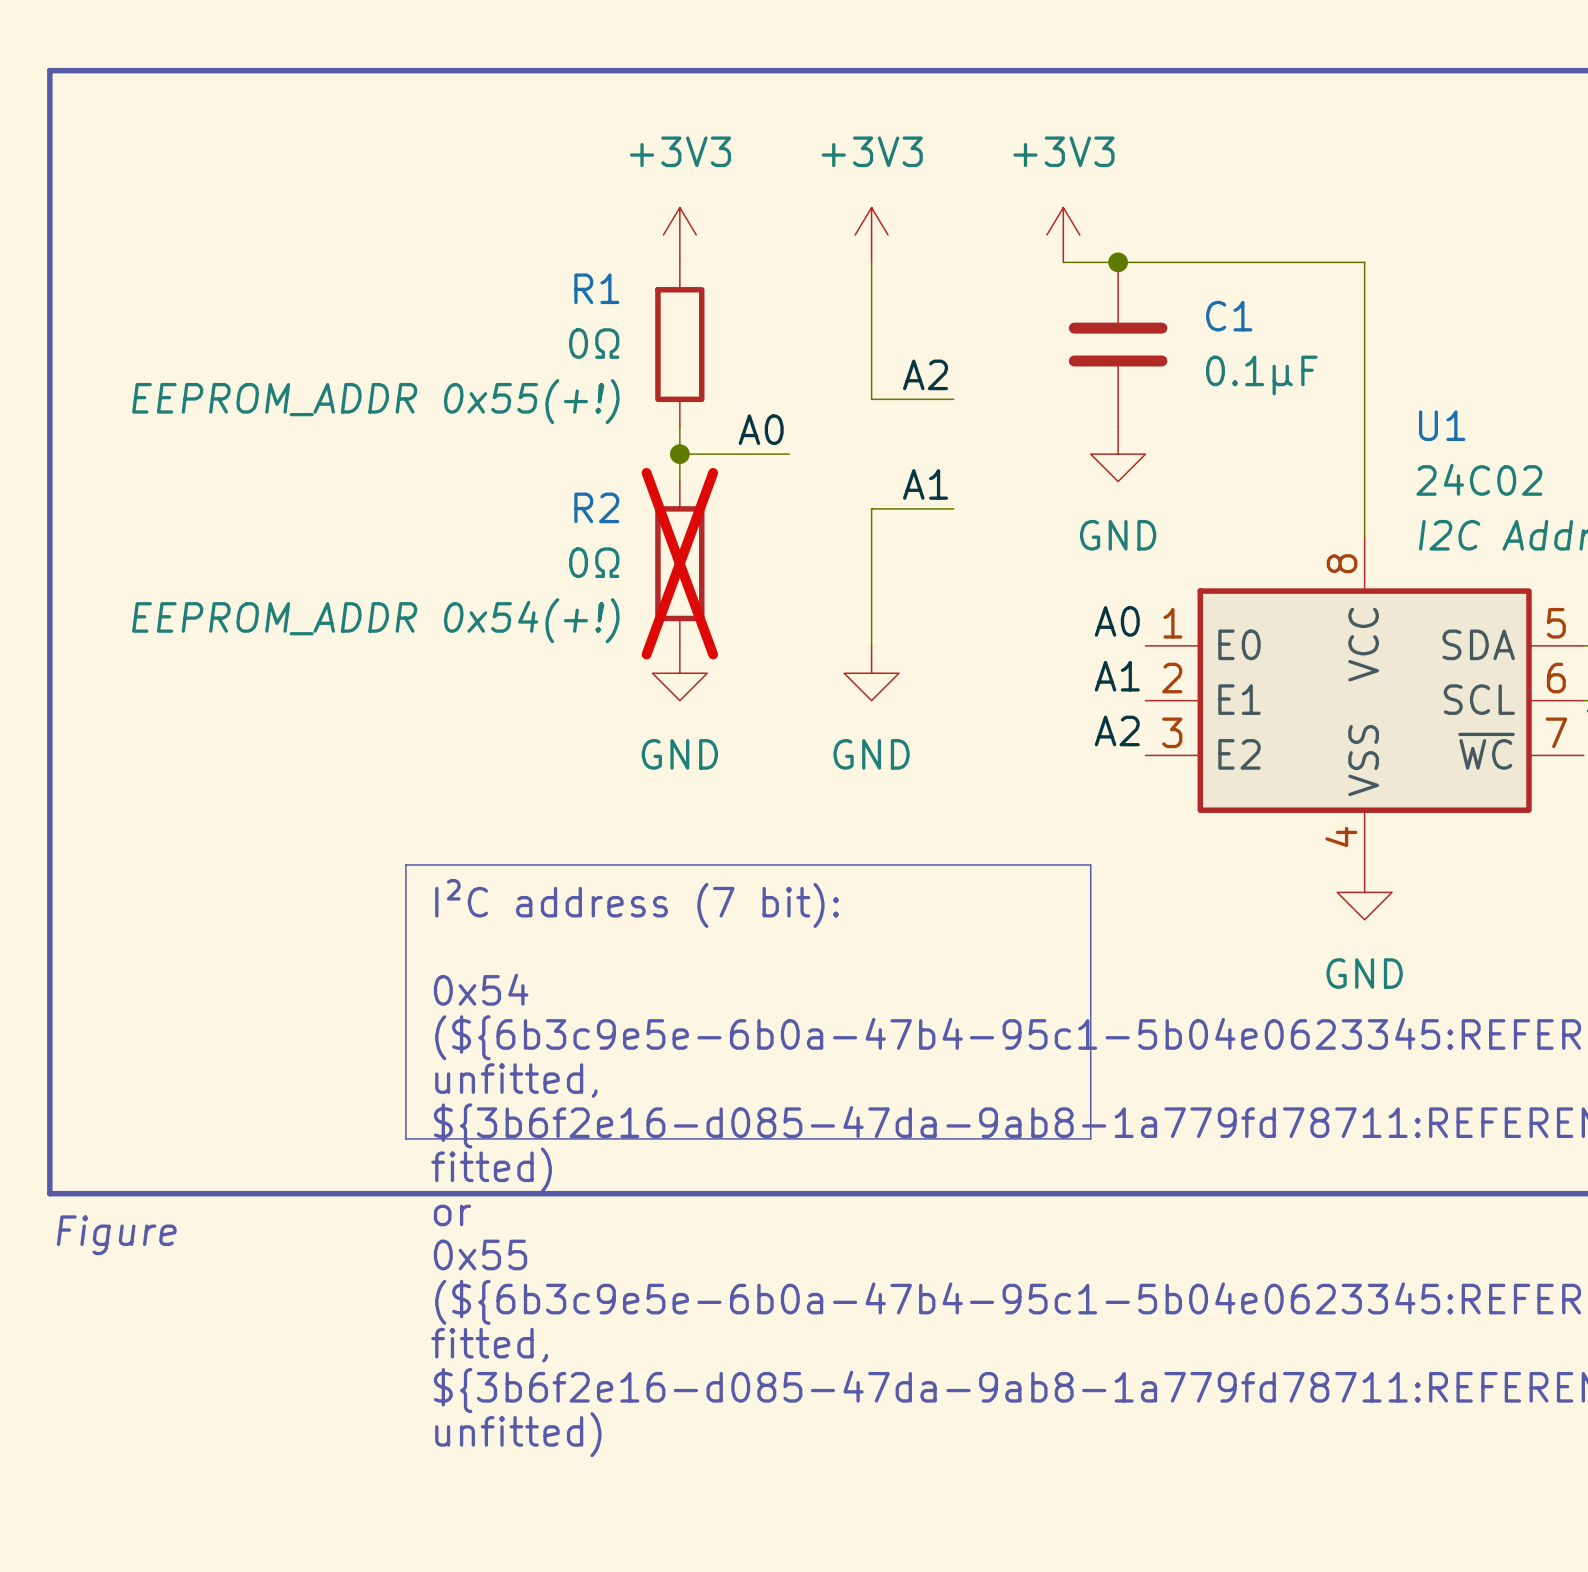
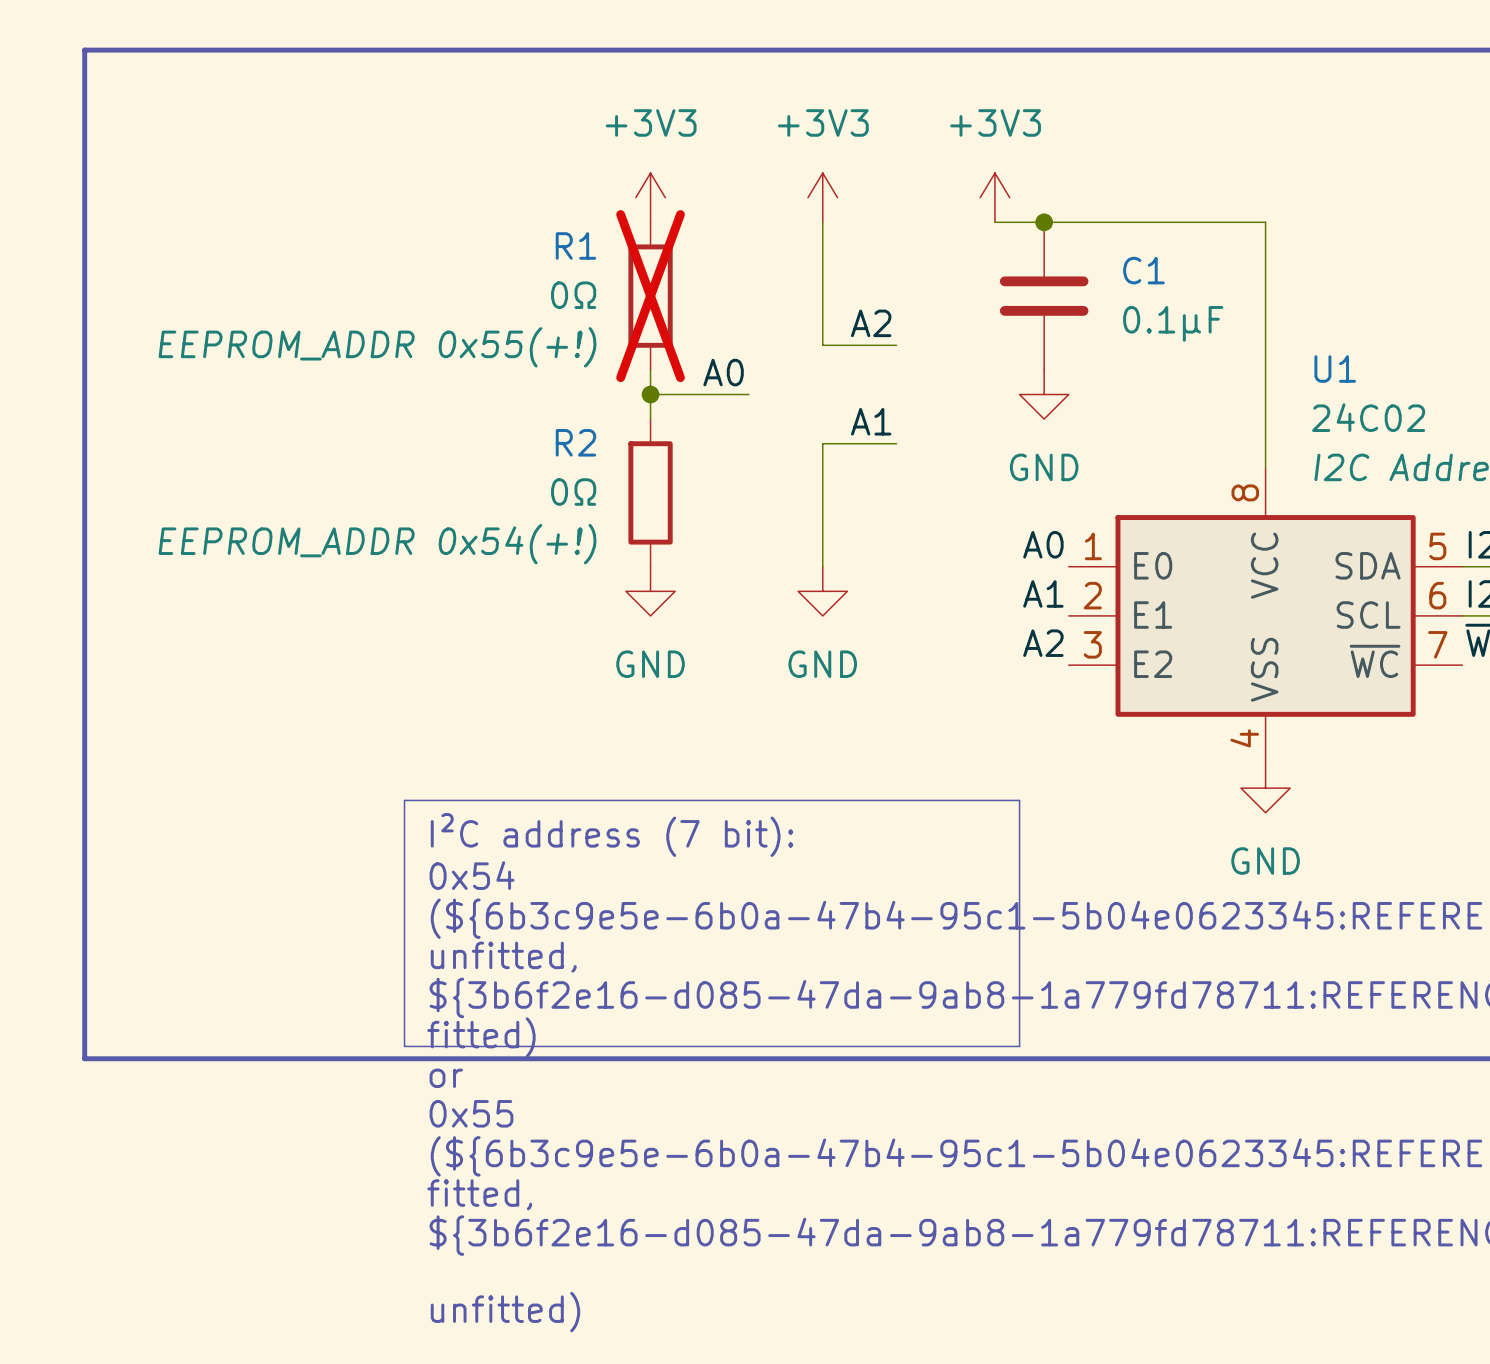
R1 do-not-place cross: none -> (650, 296)
R2 do-not-place cross: (679, 563) -> none
text position: I²C address (7 bit): (637, 903) -> I²C address (7 bit): (612, 835)
line: (405, 906) (405, 864) (1090, 864) (1090, 906) -> (404, 800) (1019, 800)
line: (405, 1138) (1090, 1138) -> (404, 1009) (404, 1046) (1019, 1046) (1019, 1009)
text: Figure (116, 1235) -> none
text position: unfitted) (518, 1434) -> unfitted) (505, 1312)

